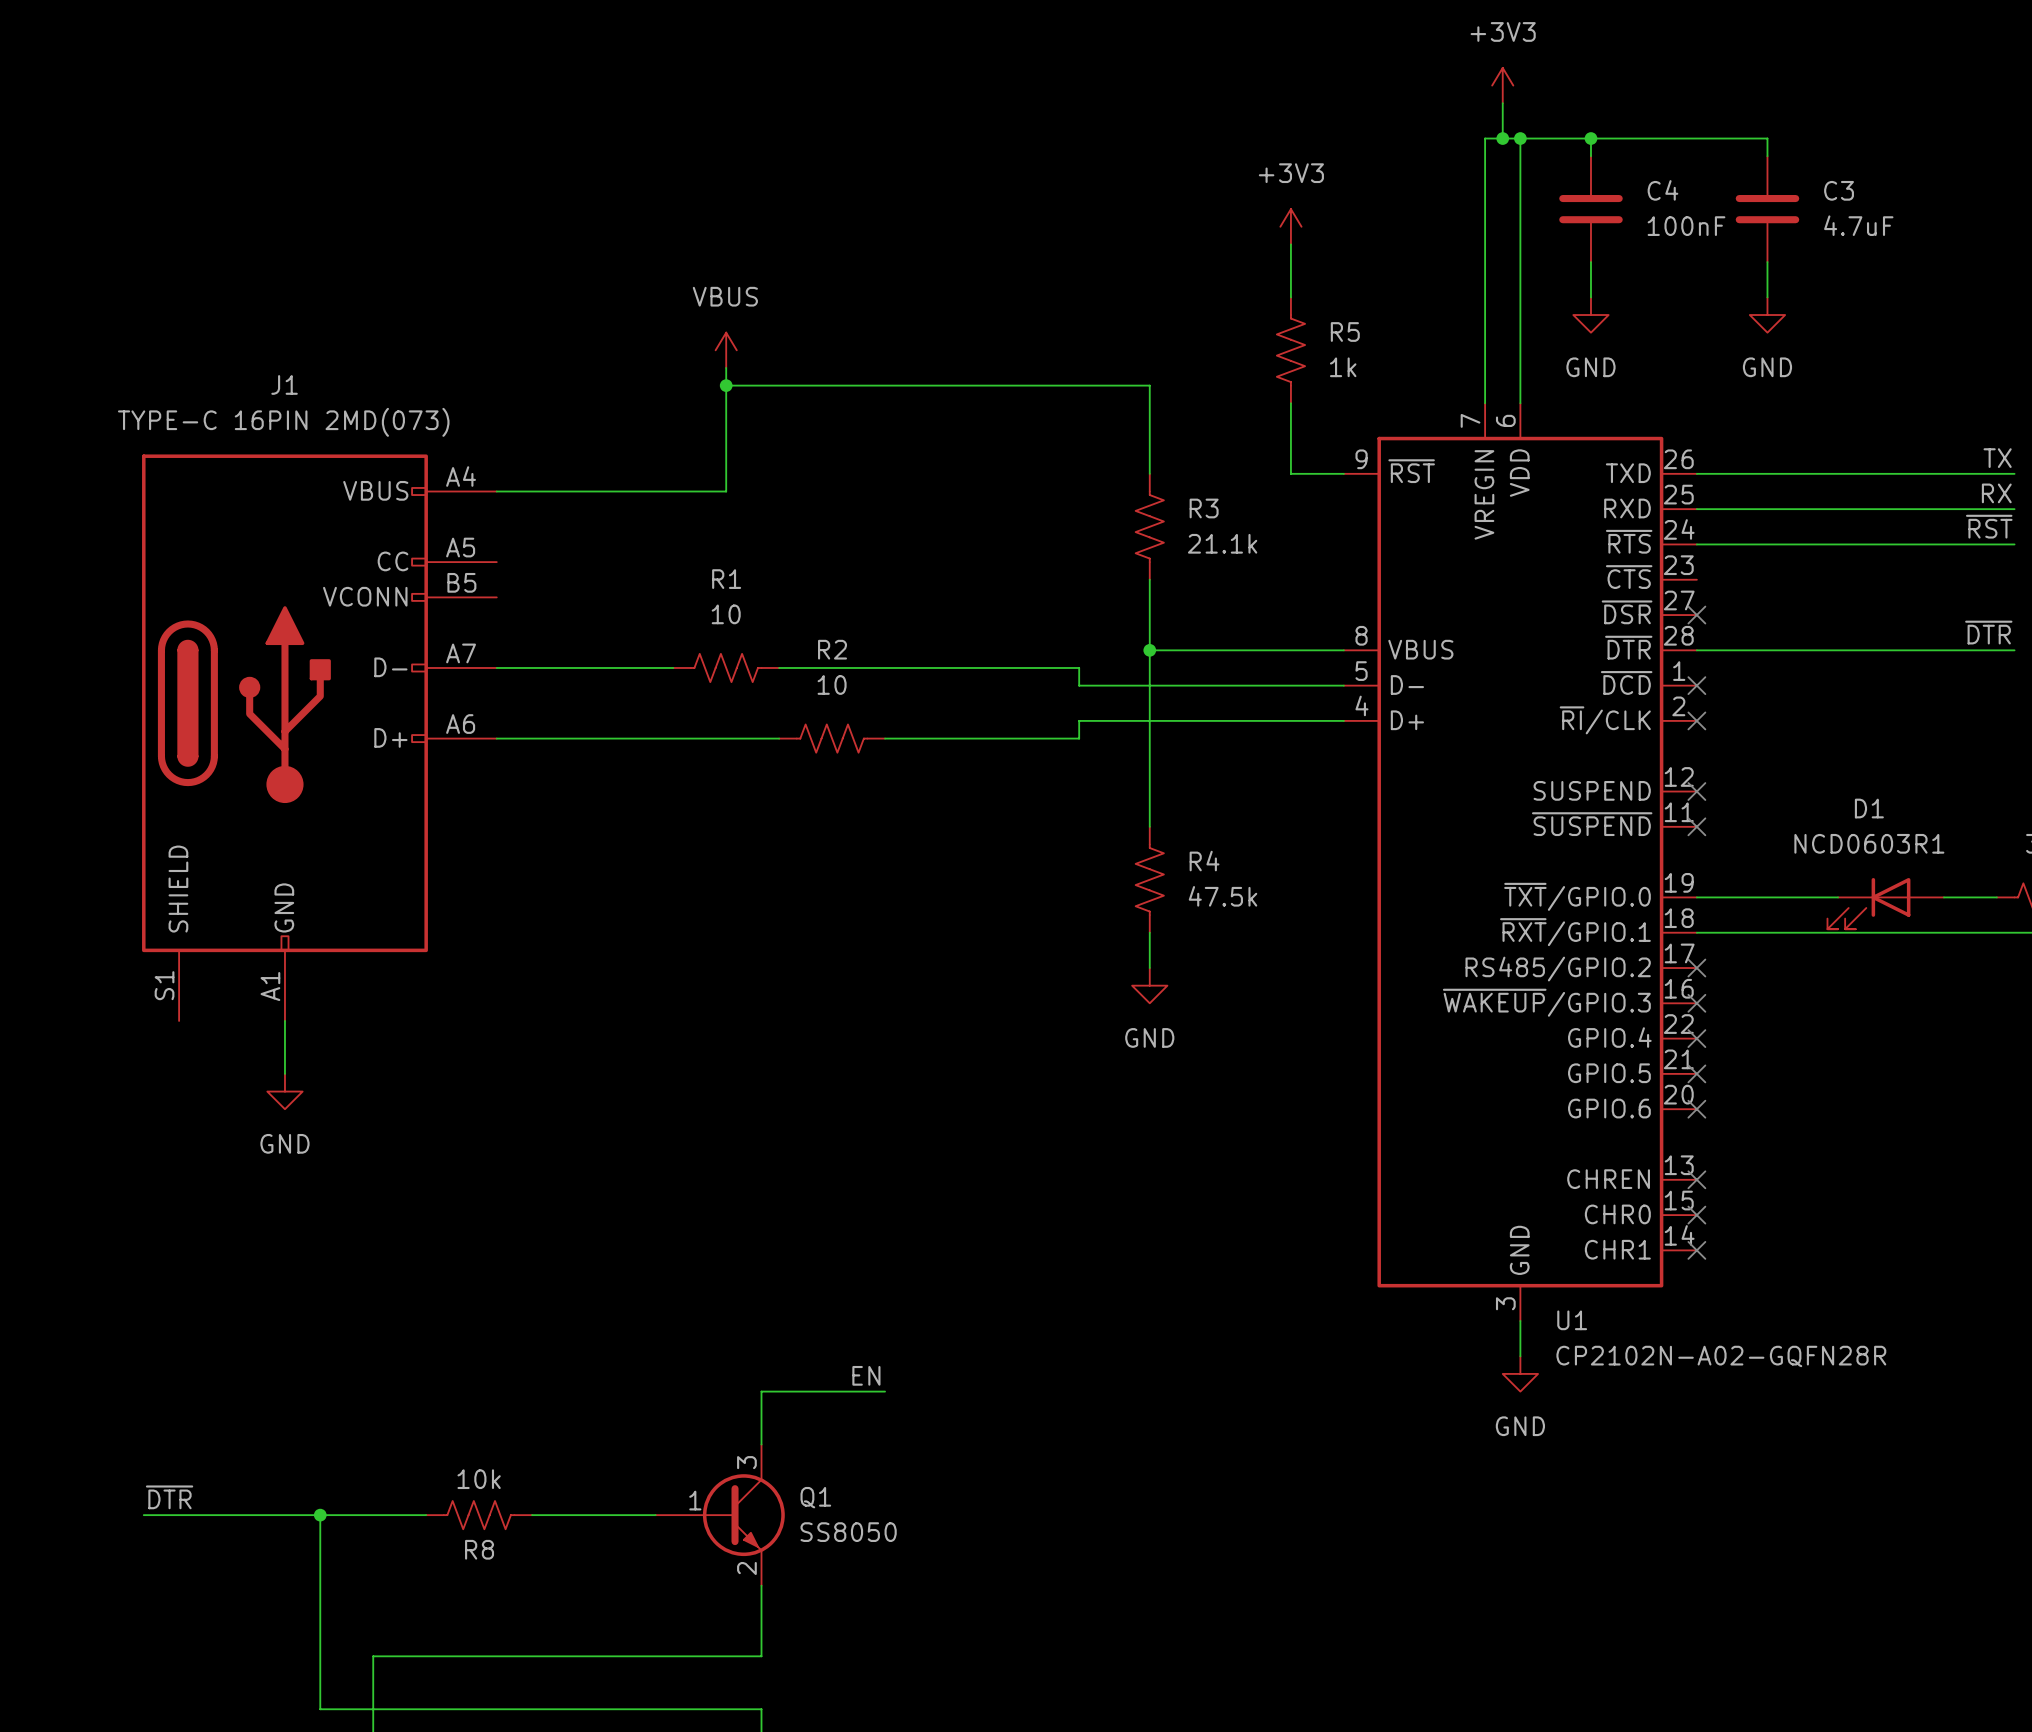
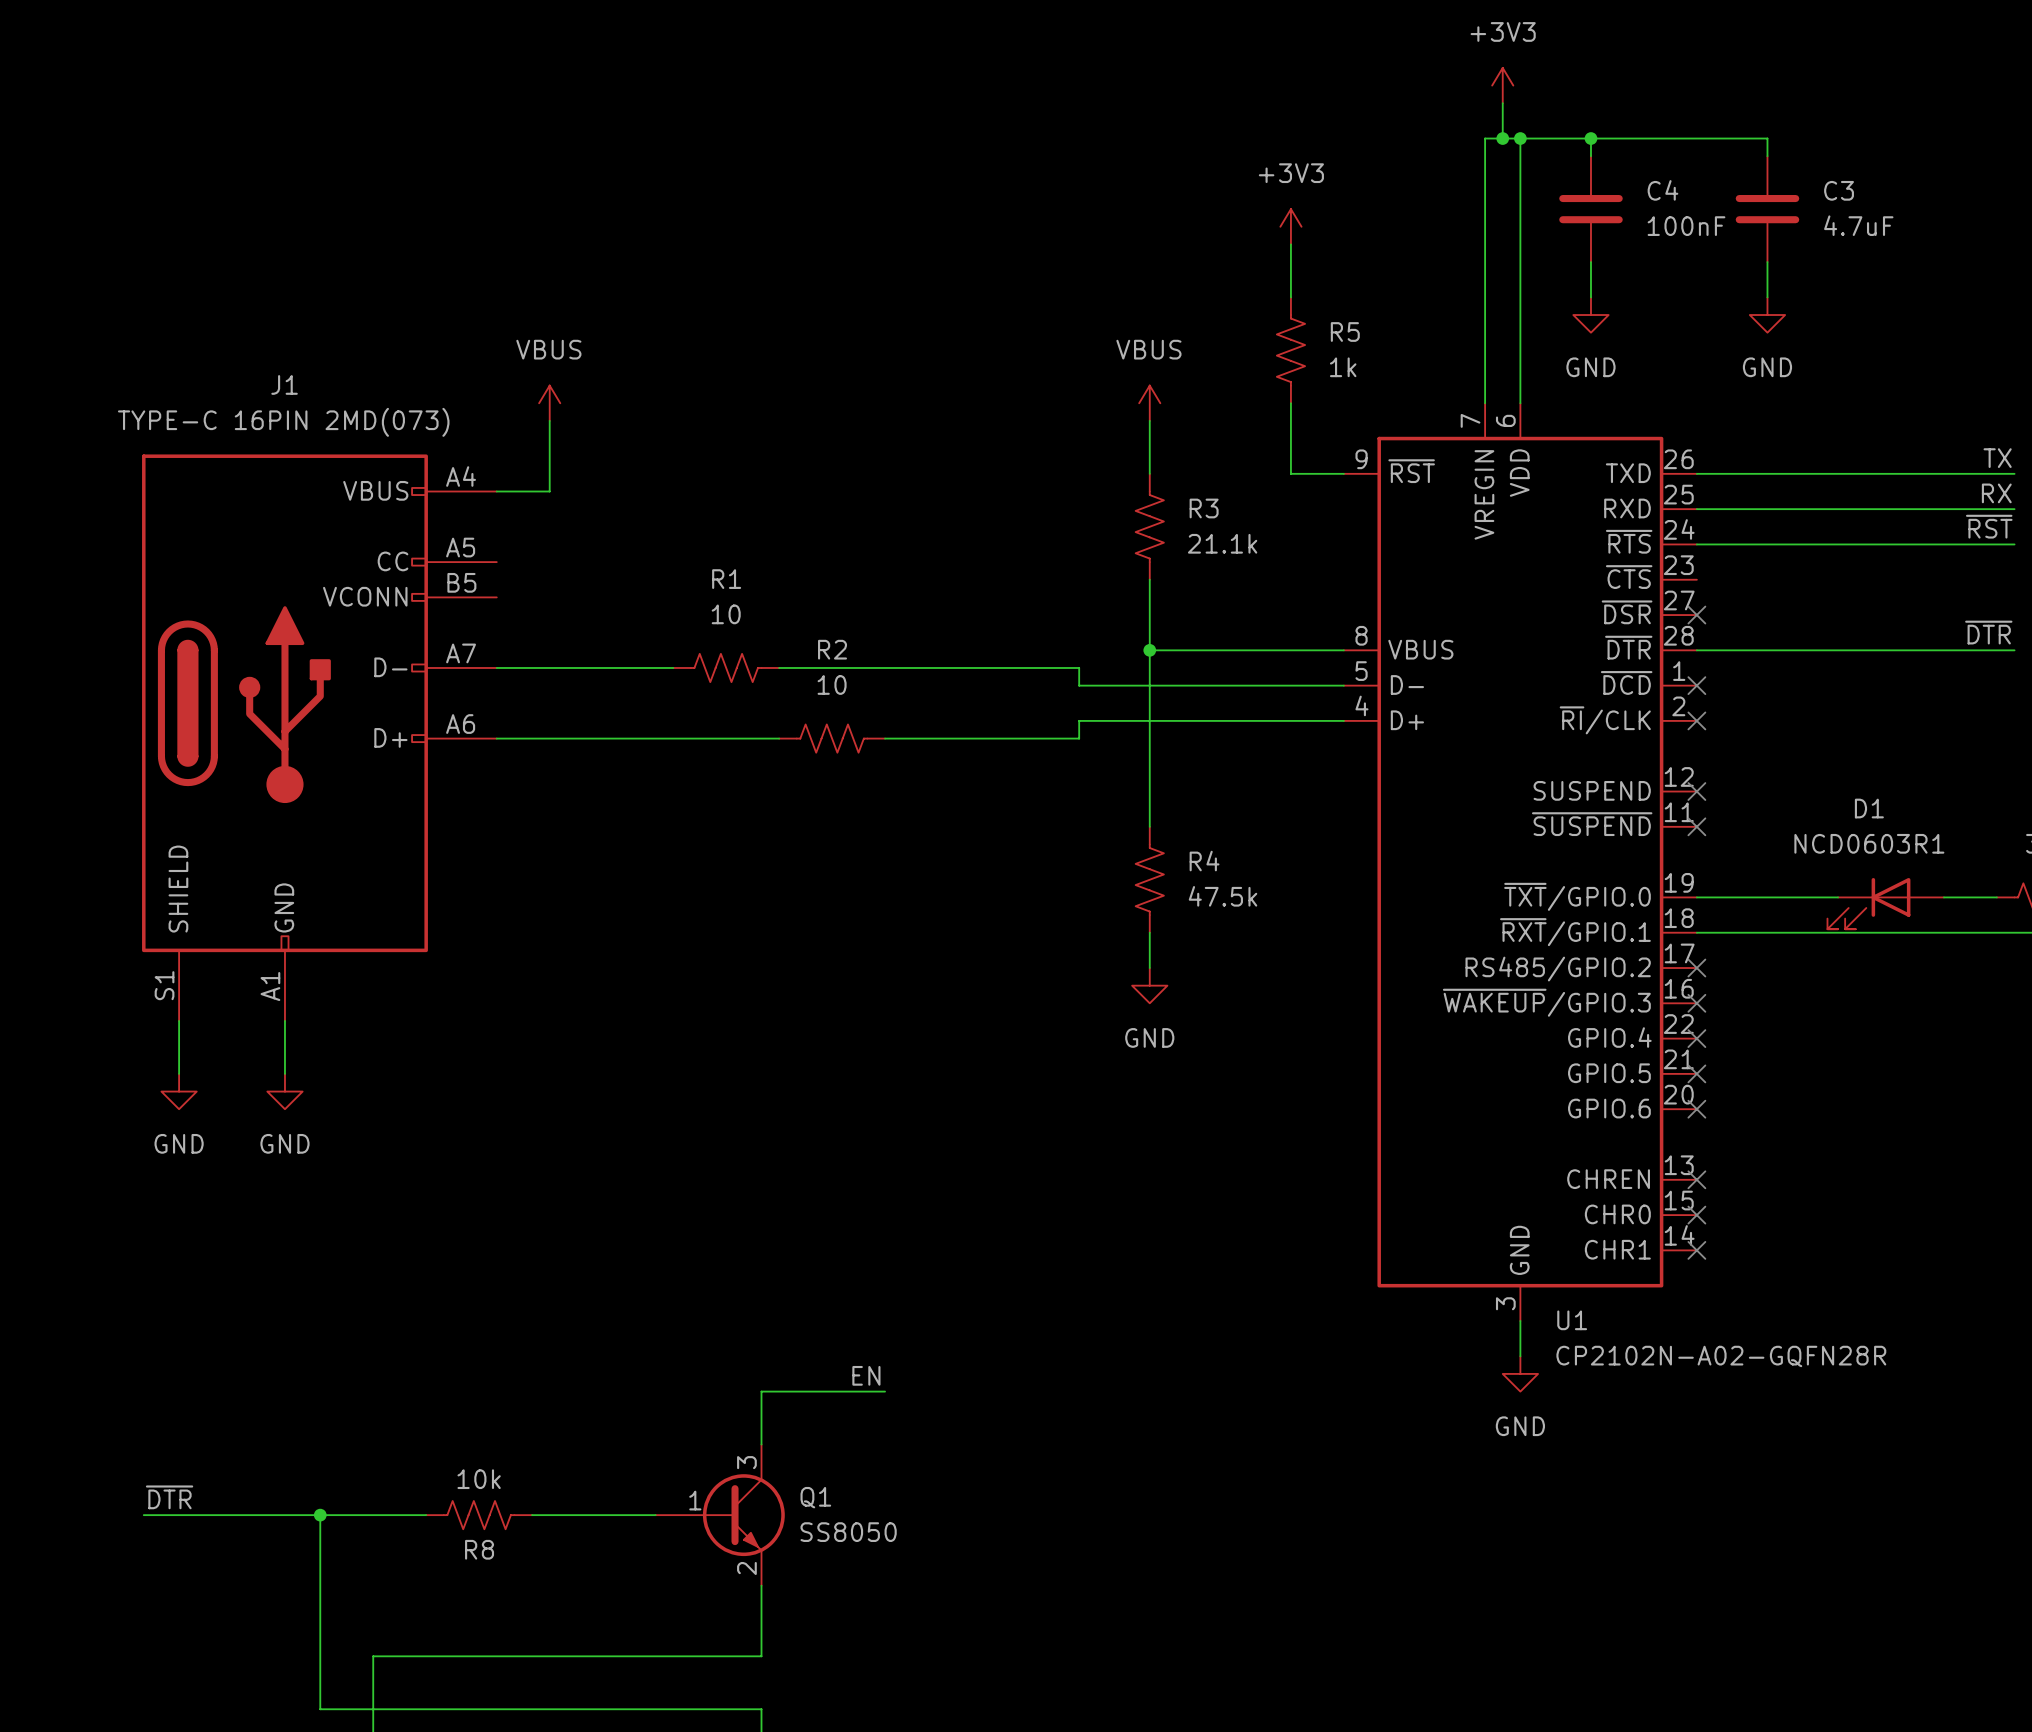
power symbol position: VBUS (726, 350) -> VBUS (549, 403)
wire: (726, 367) (726, 491) (549, 491) -> (549, 420) (549, 491)
wire: (726, 385) (1149, 385) (1149, 420) -> none
junction: (726, 385) -> none
power symbol: none -> VBUS (1149, 403)
wire: none -> (179, 1020) (179, 1073)
power symbol: none -> GND (179, 1091)

